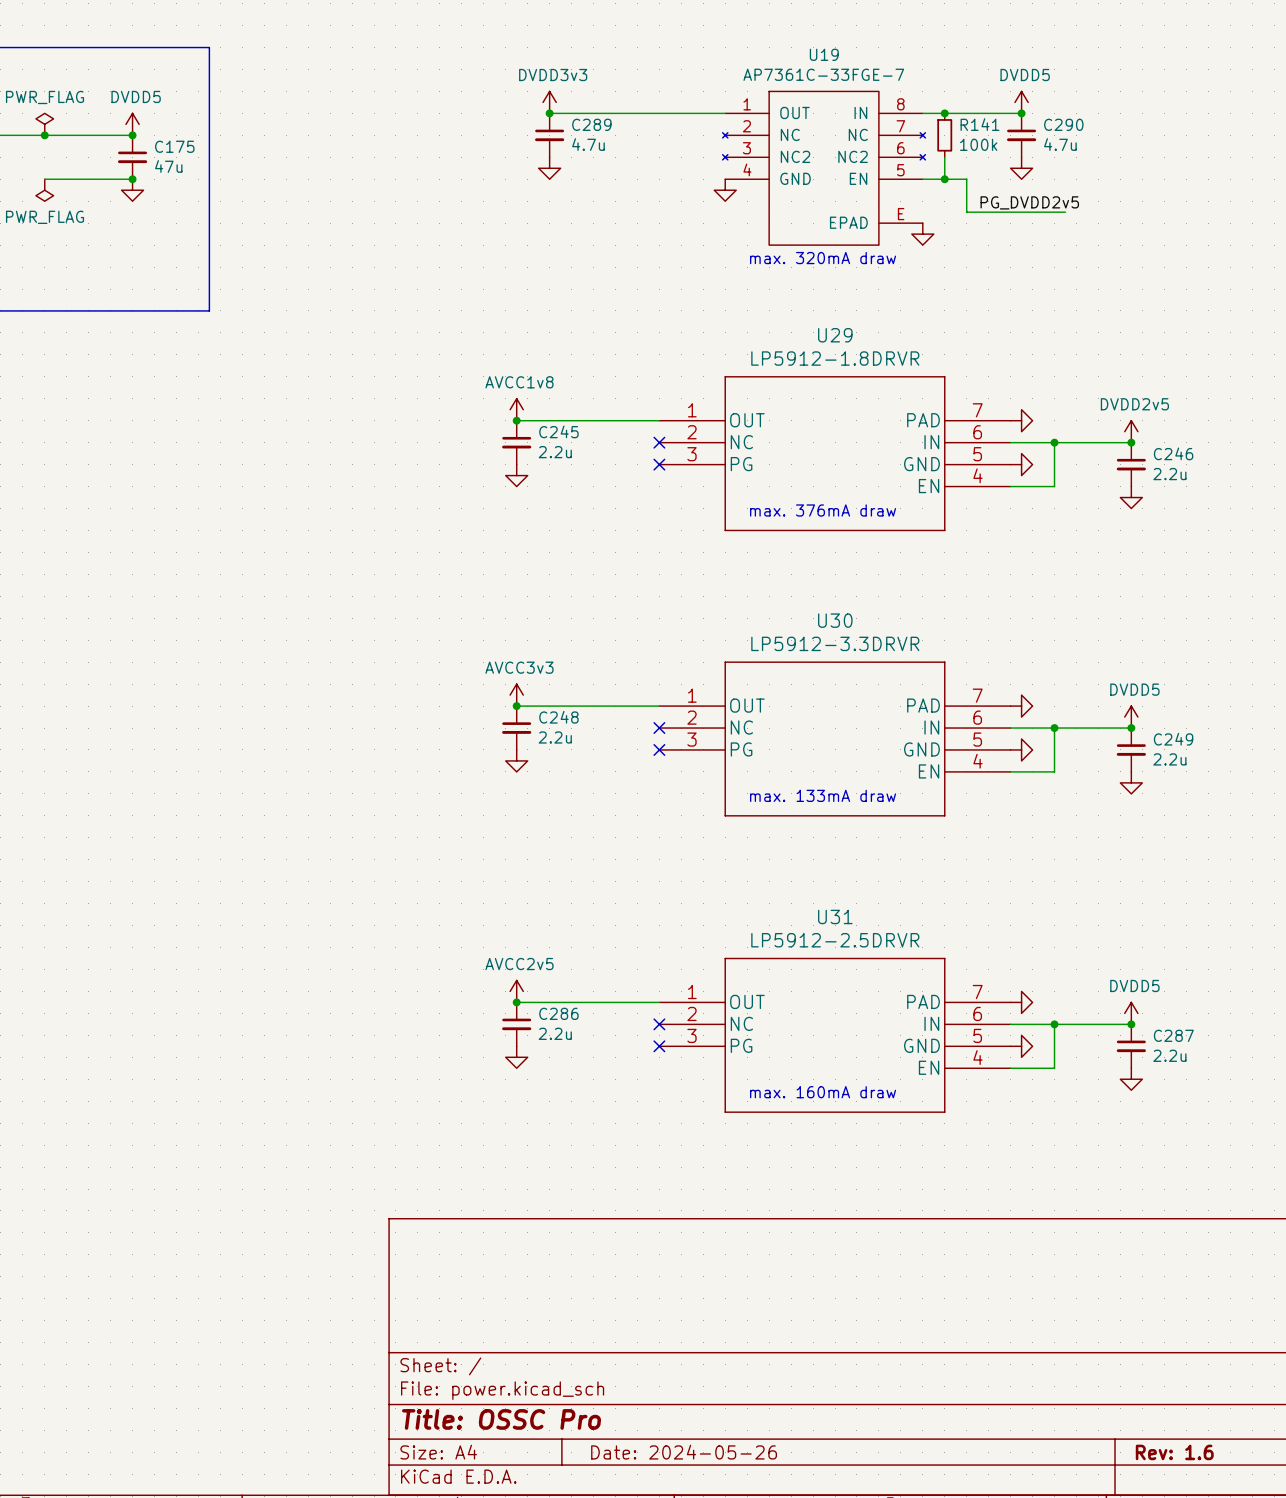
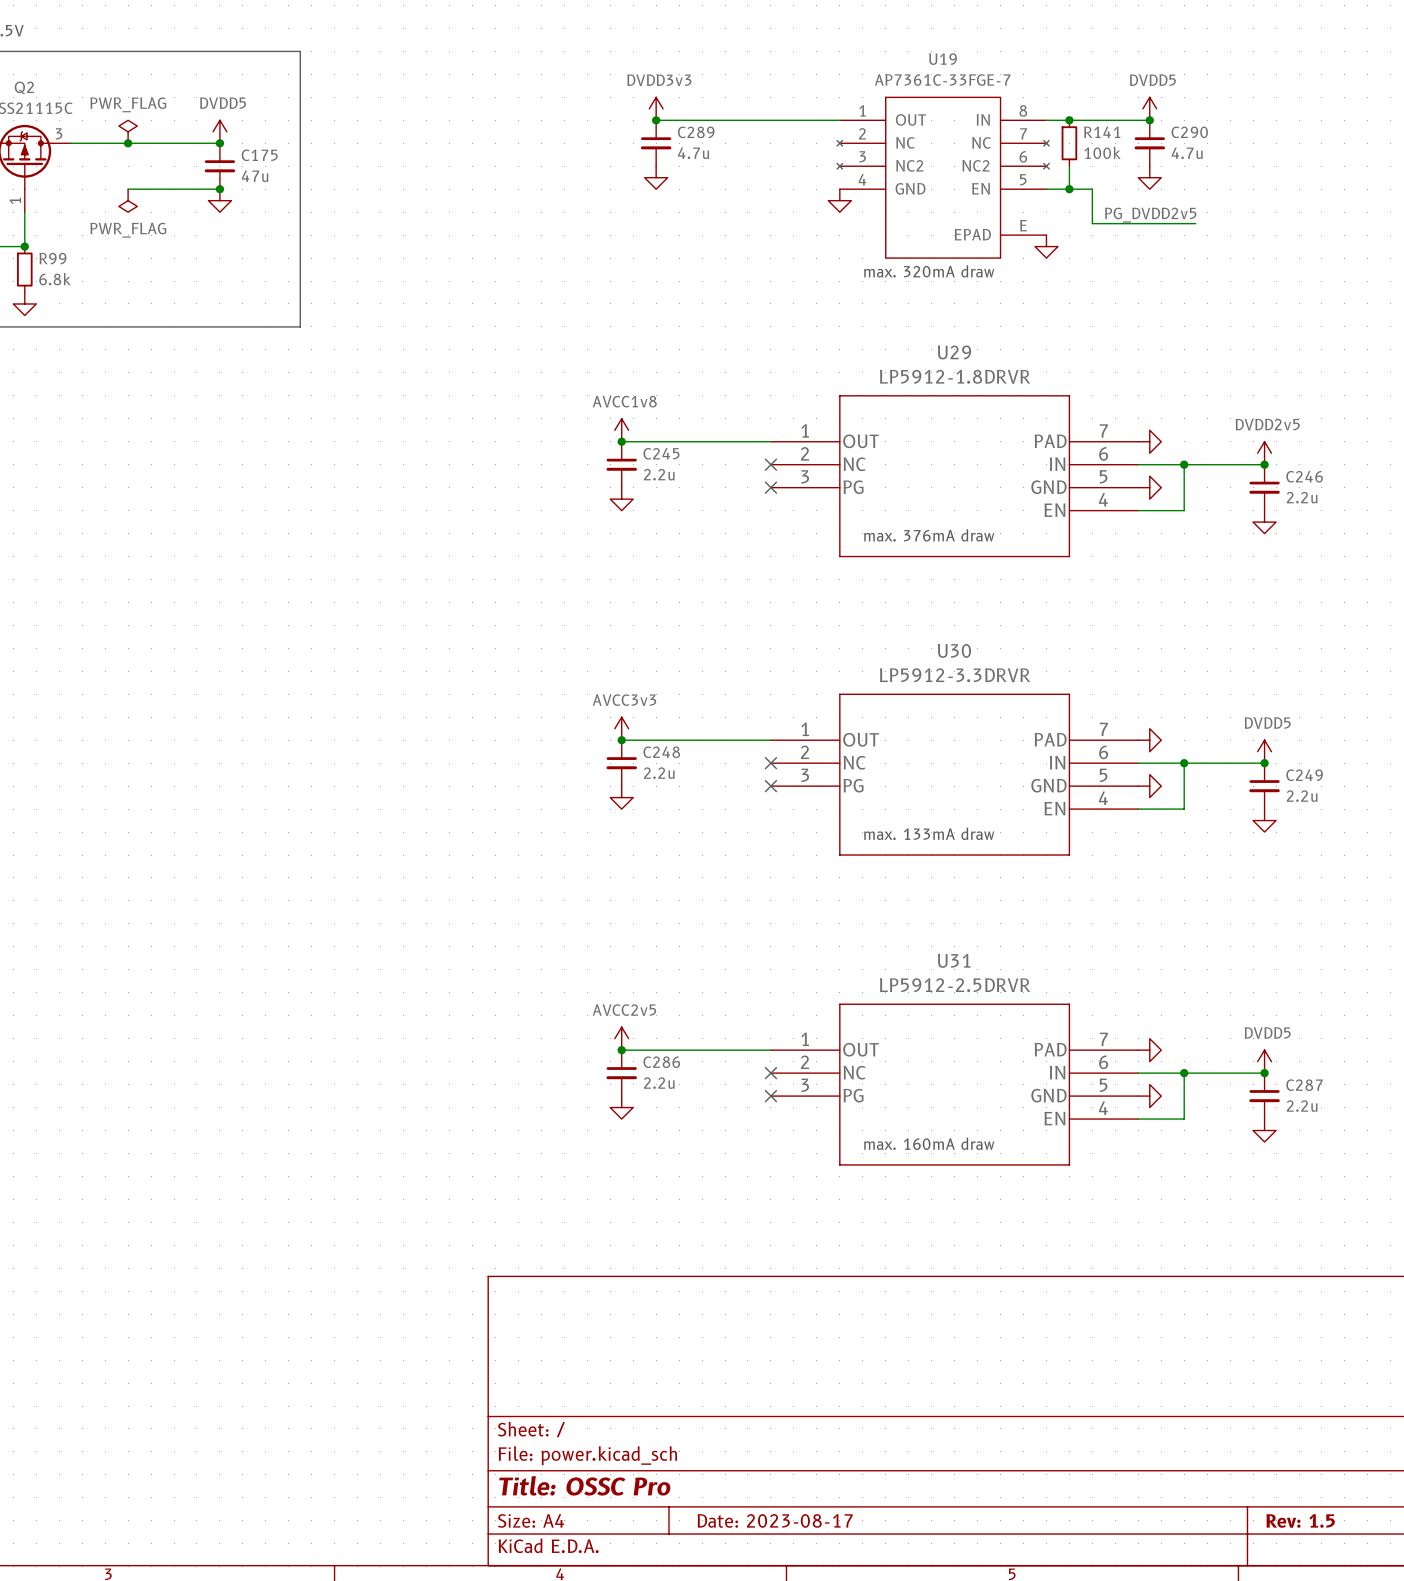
title block: Date: 2024-05-26 (684, 1452) -> Date: 2023-08-17 (775, 1520)
title block: Rev: 1.6 (1174, 1452) -> Rev: 1.5 (1300, 1520)

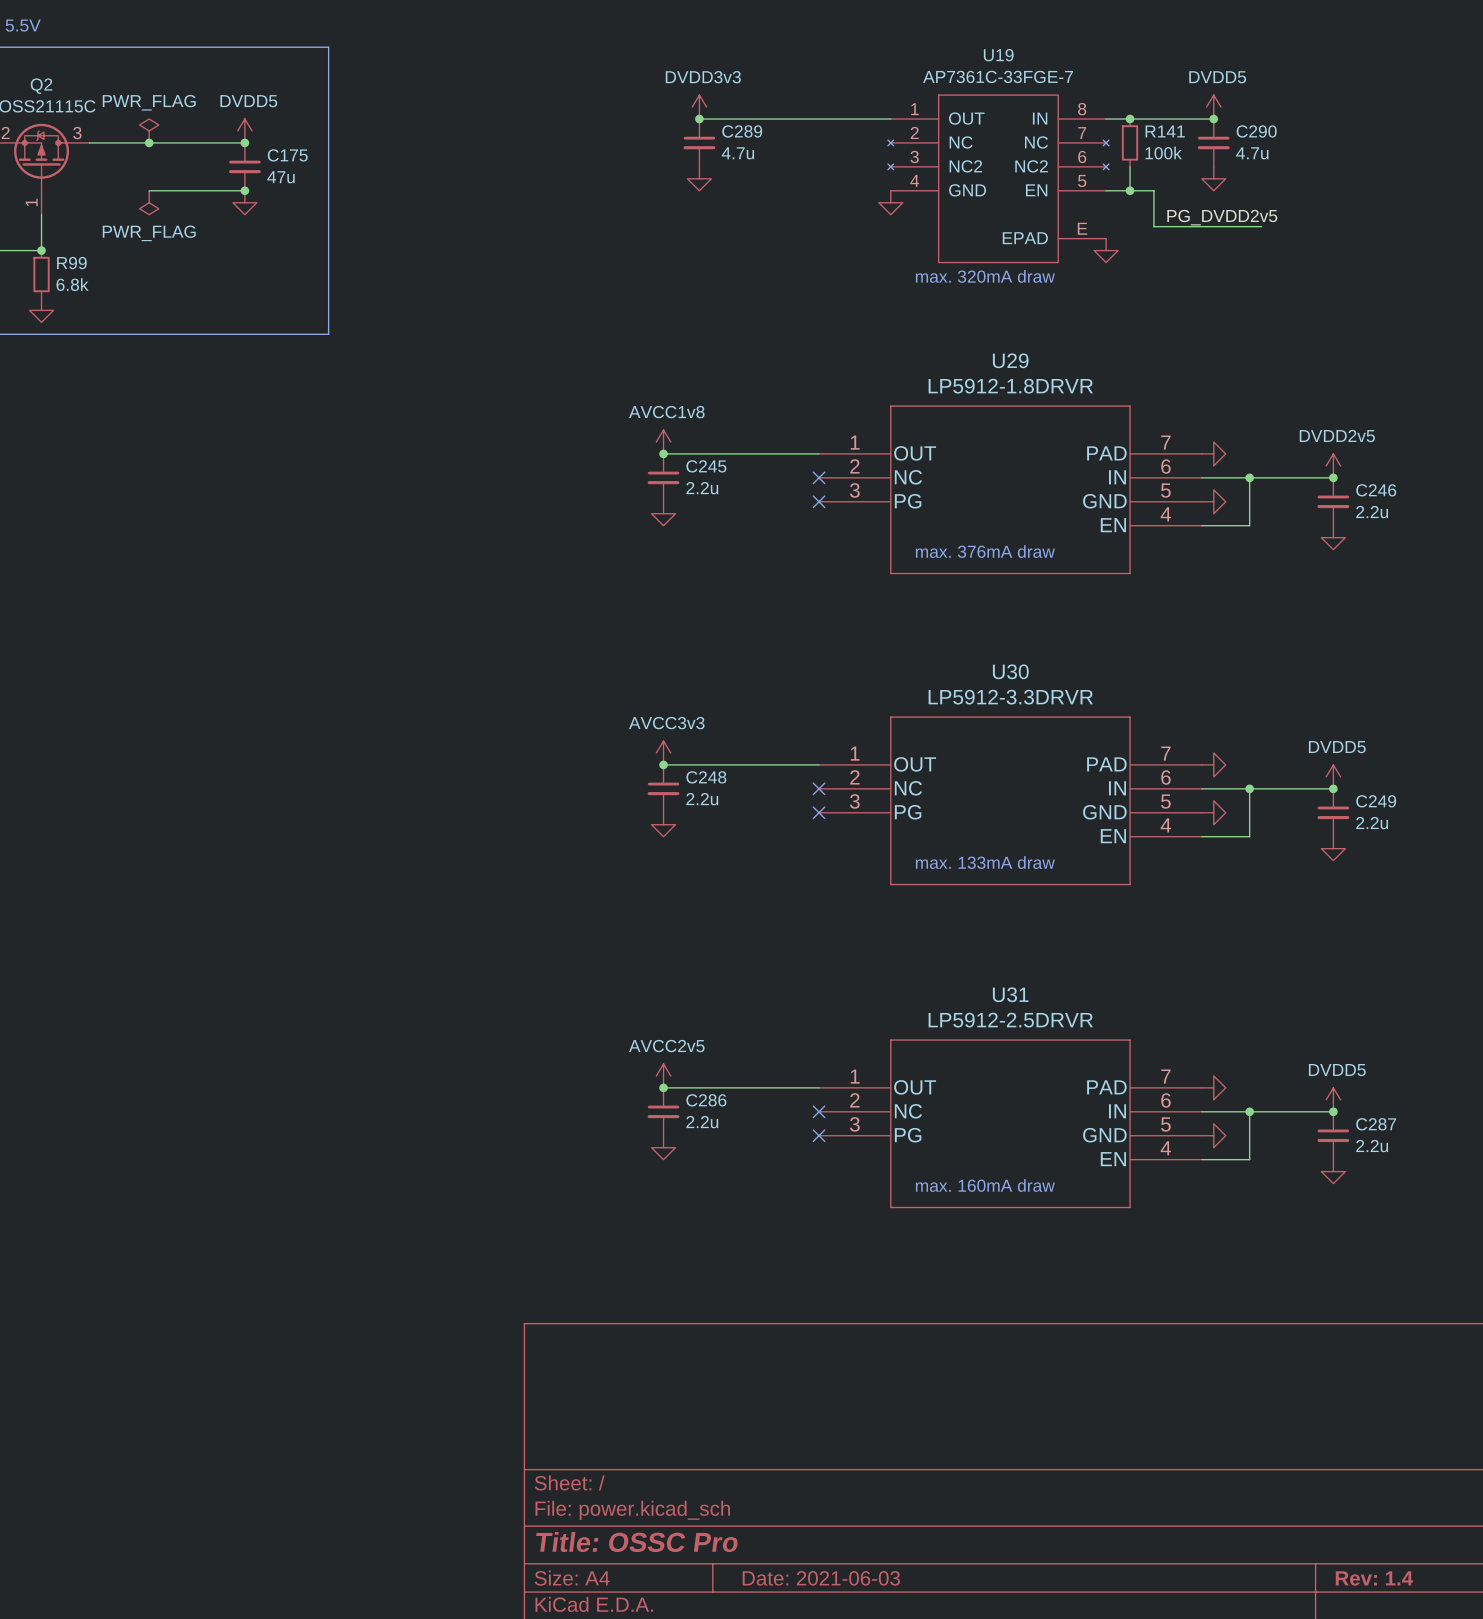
title block: Date: 2023-08-17 (775, 1520) -> Date: 2021-06-03 (821, 1578)
title block: Rev: 1.5 (1300, 1520) -> Rev: 1.4 (1374, 1578)

